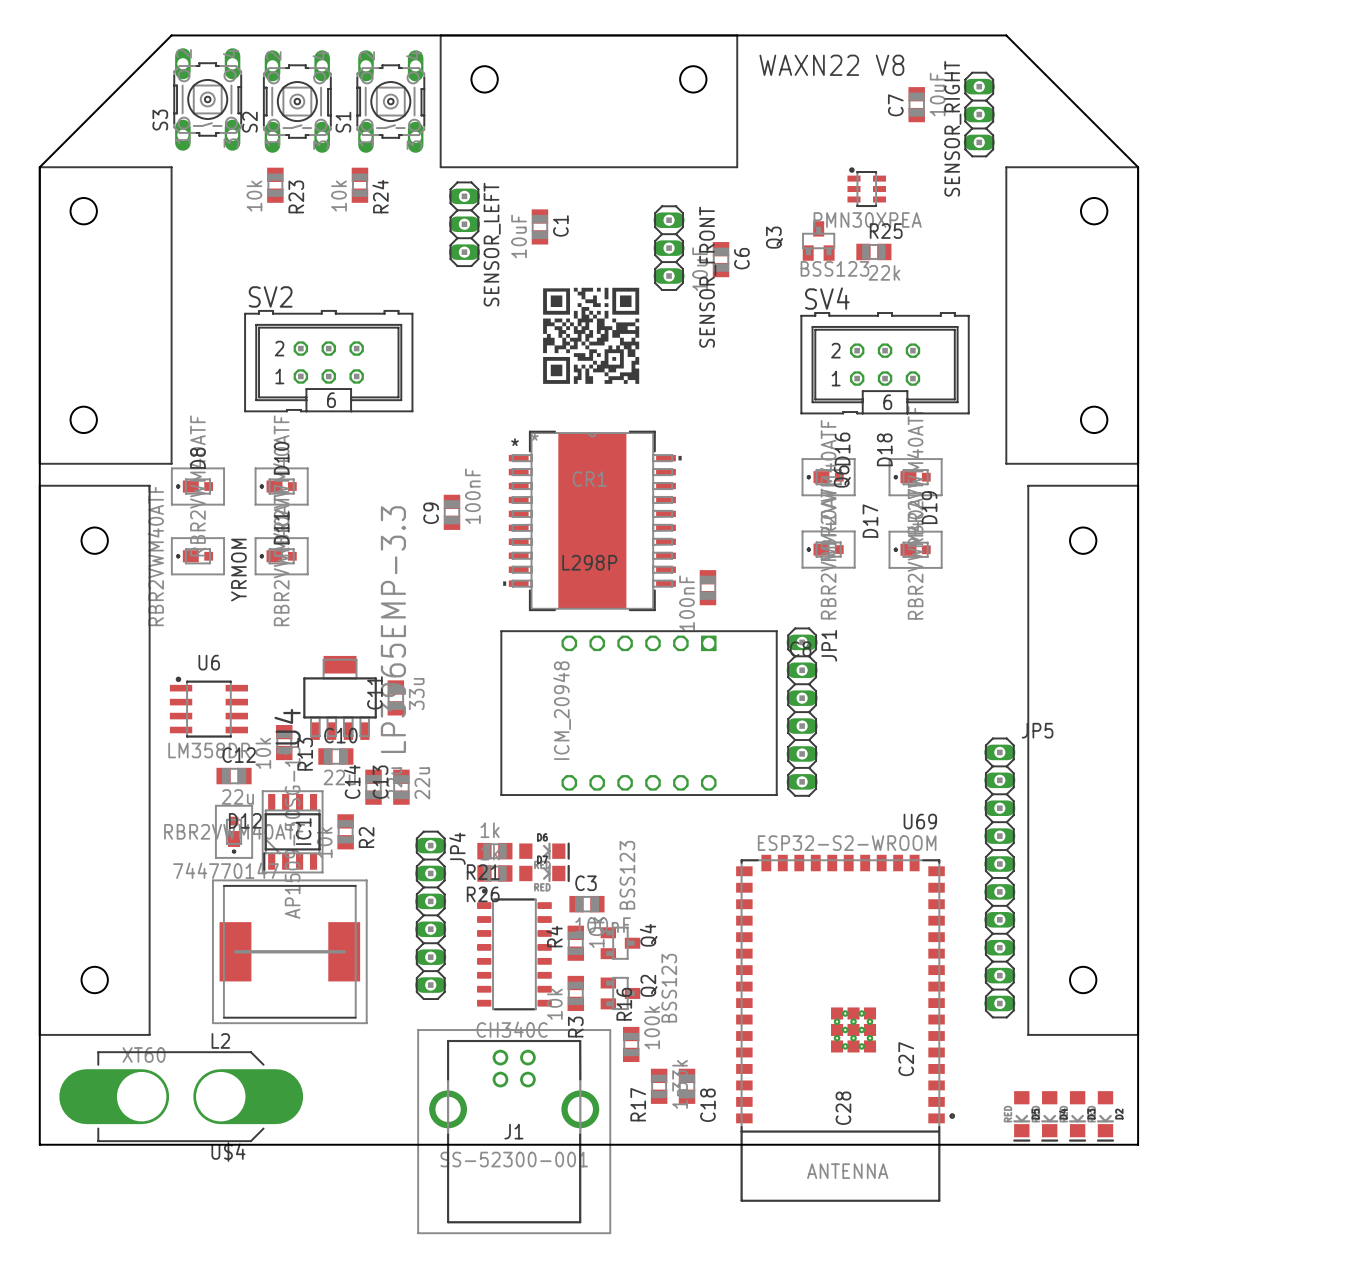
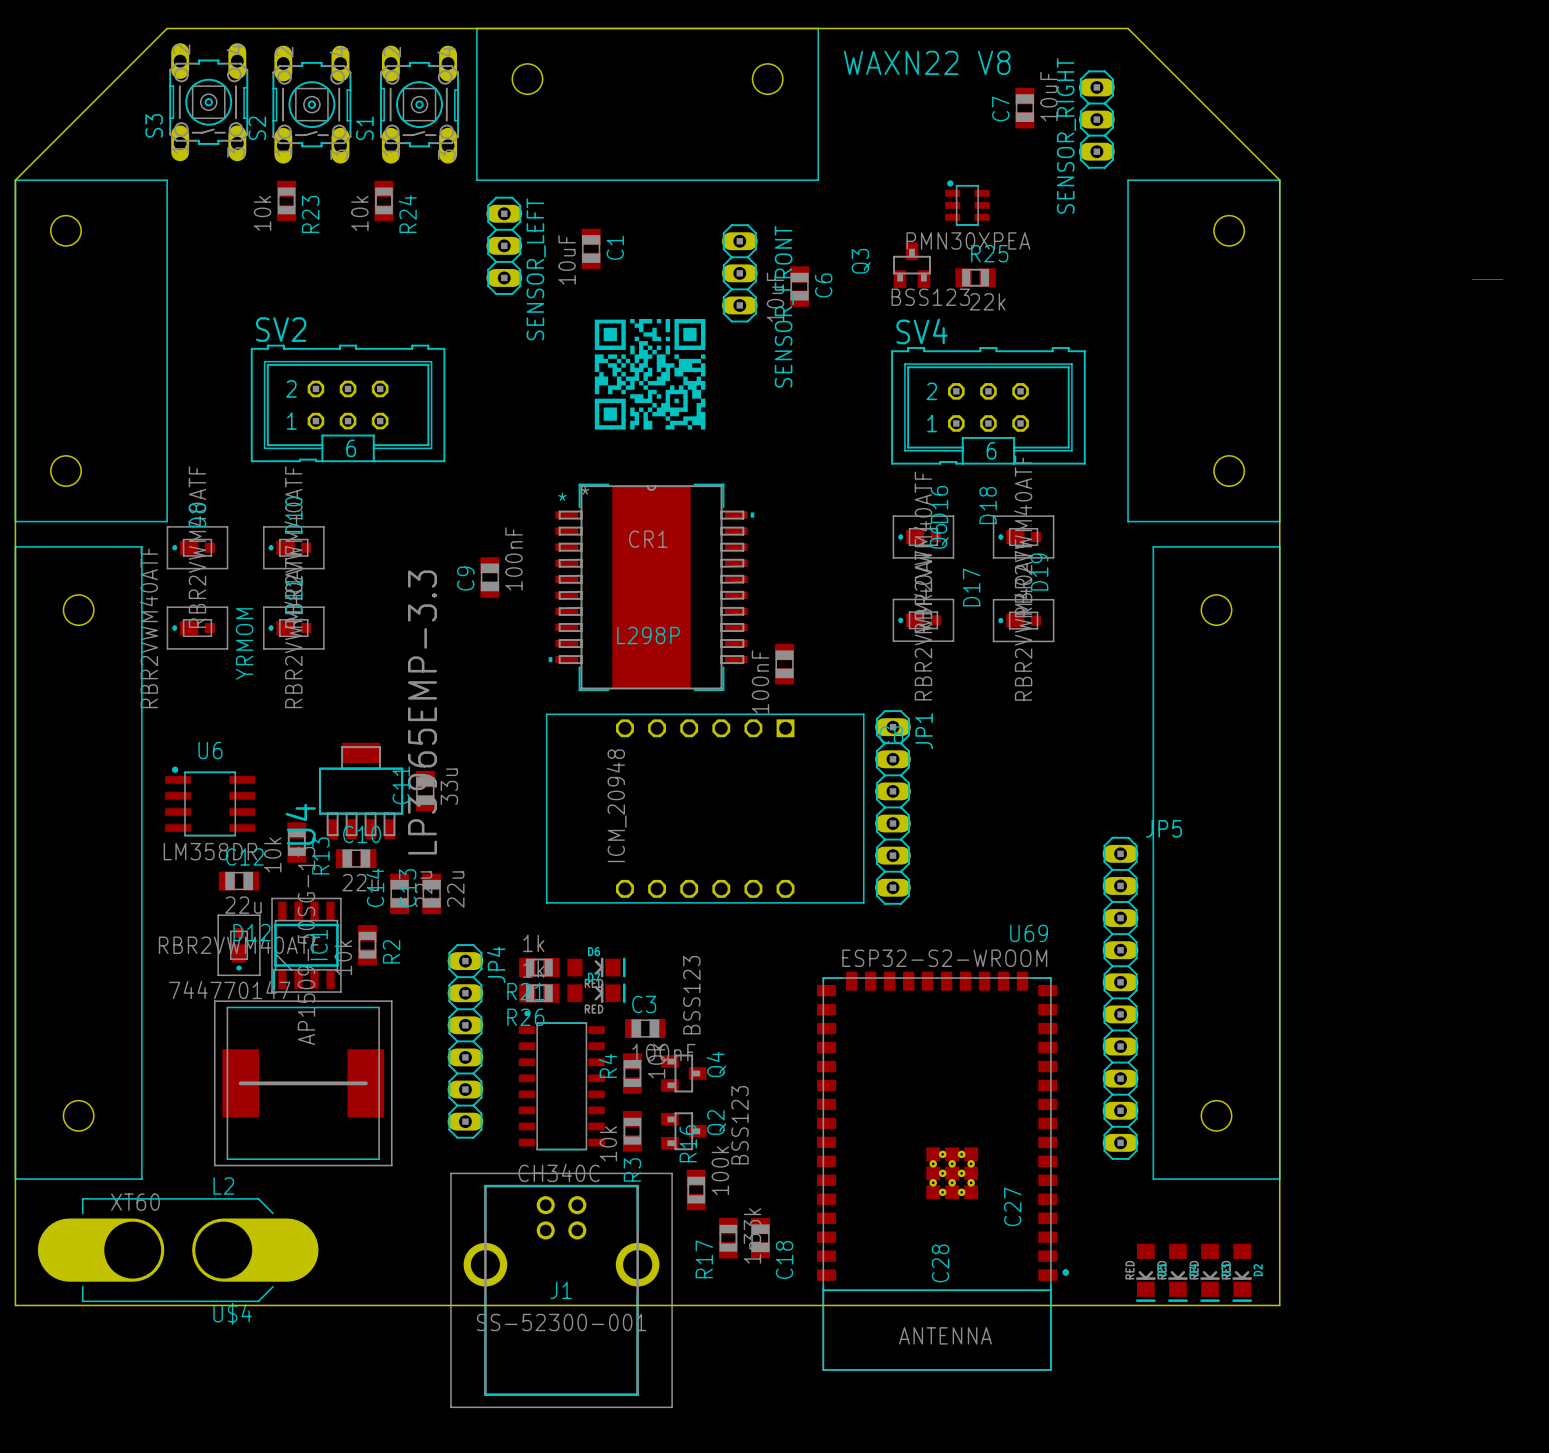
drawing: none -> [1472, 279, 1504, 280]

